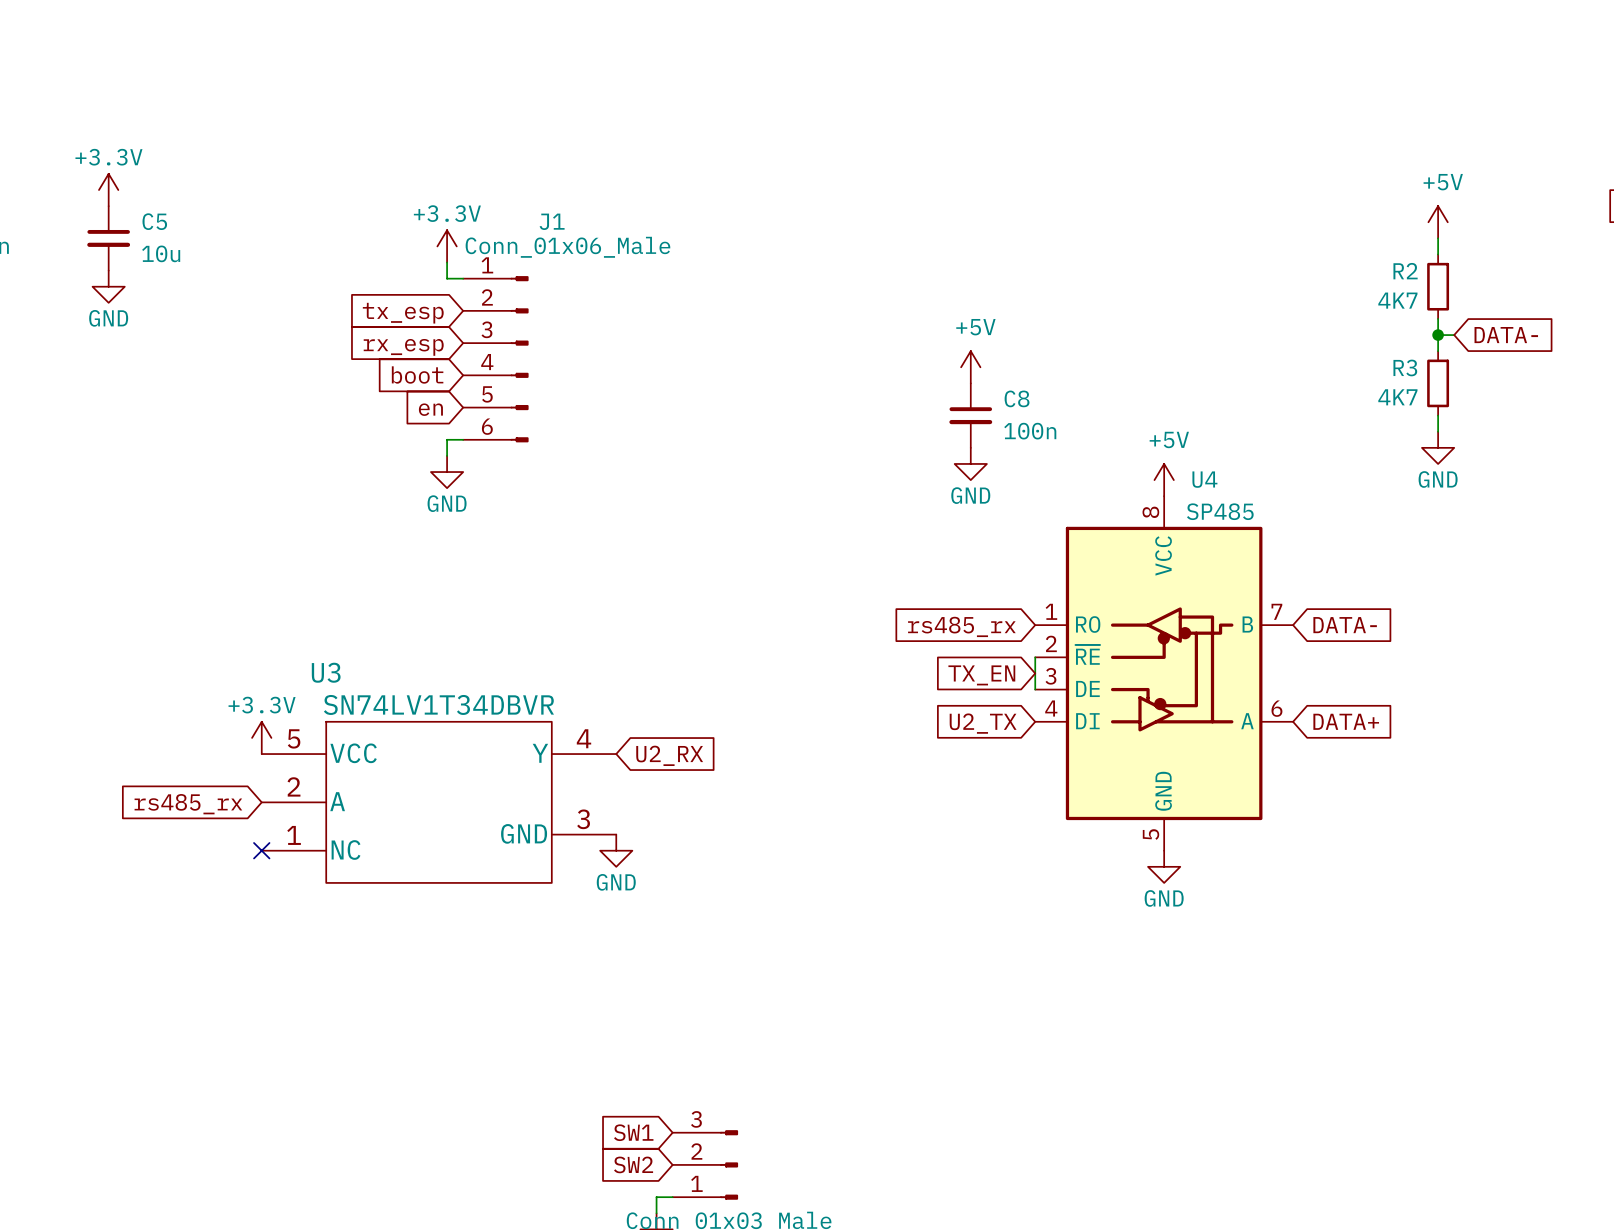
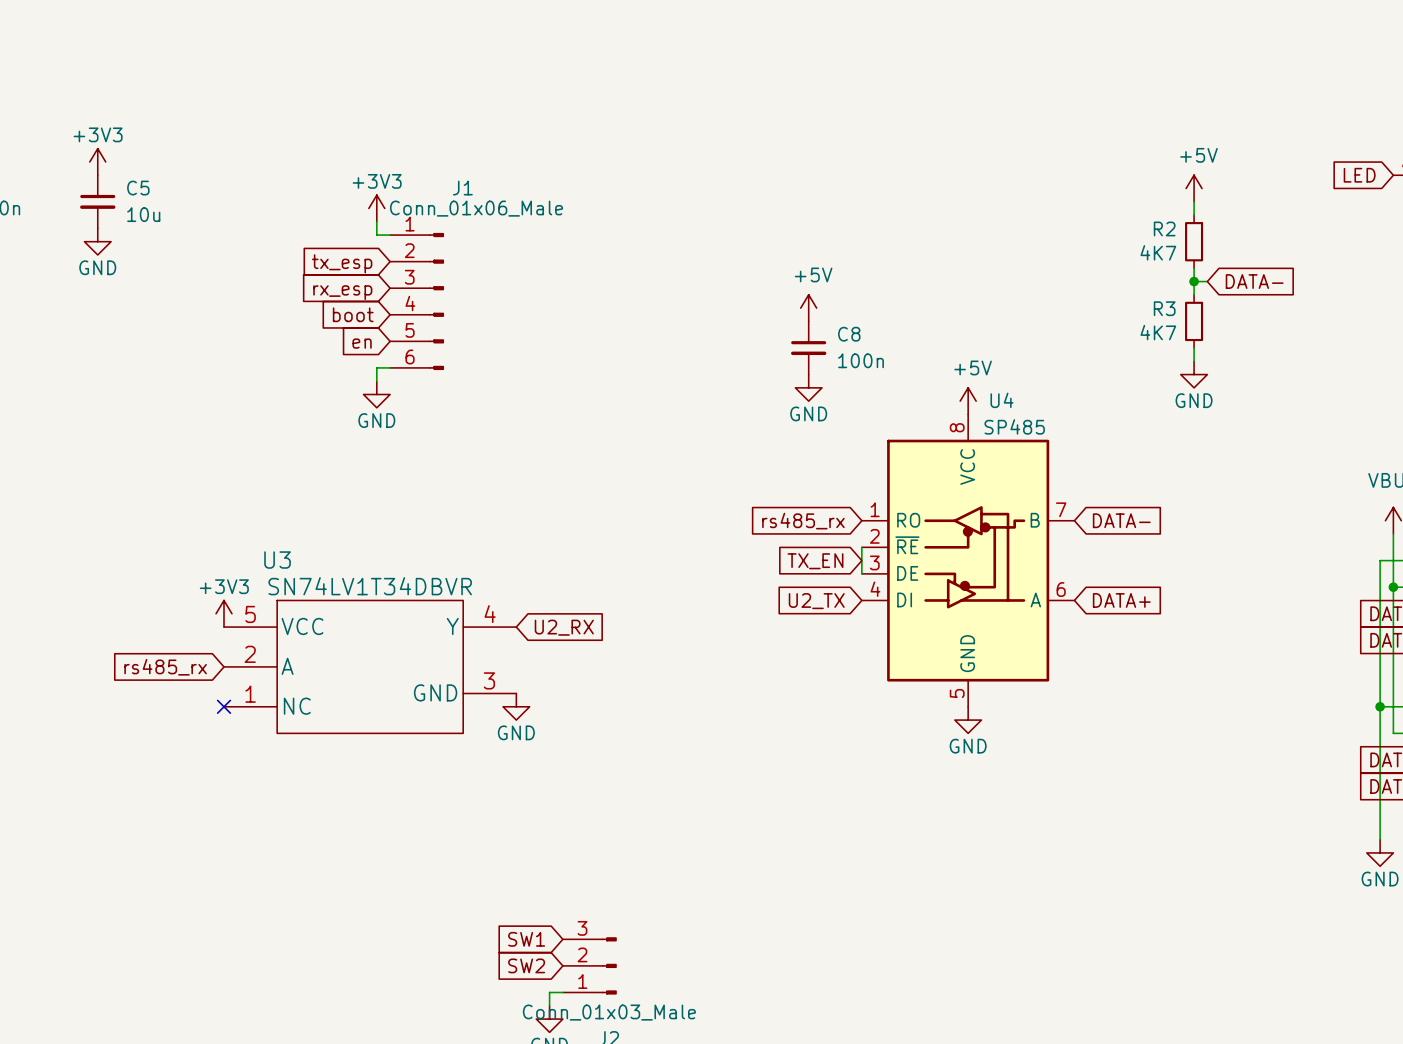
power symbol: +3.3V (108, 190) -> +3V3 (97, 161)
power symbol: +3.3V (447, 246) -> +3V3 (376, 208)
power symbol: +3.3V (261, 737) -> +3V3 (224, 613)

